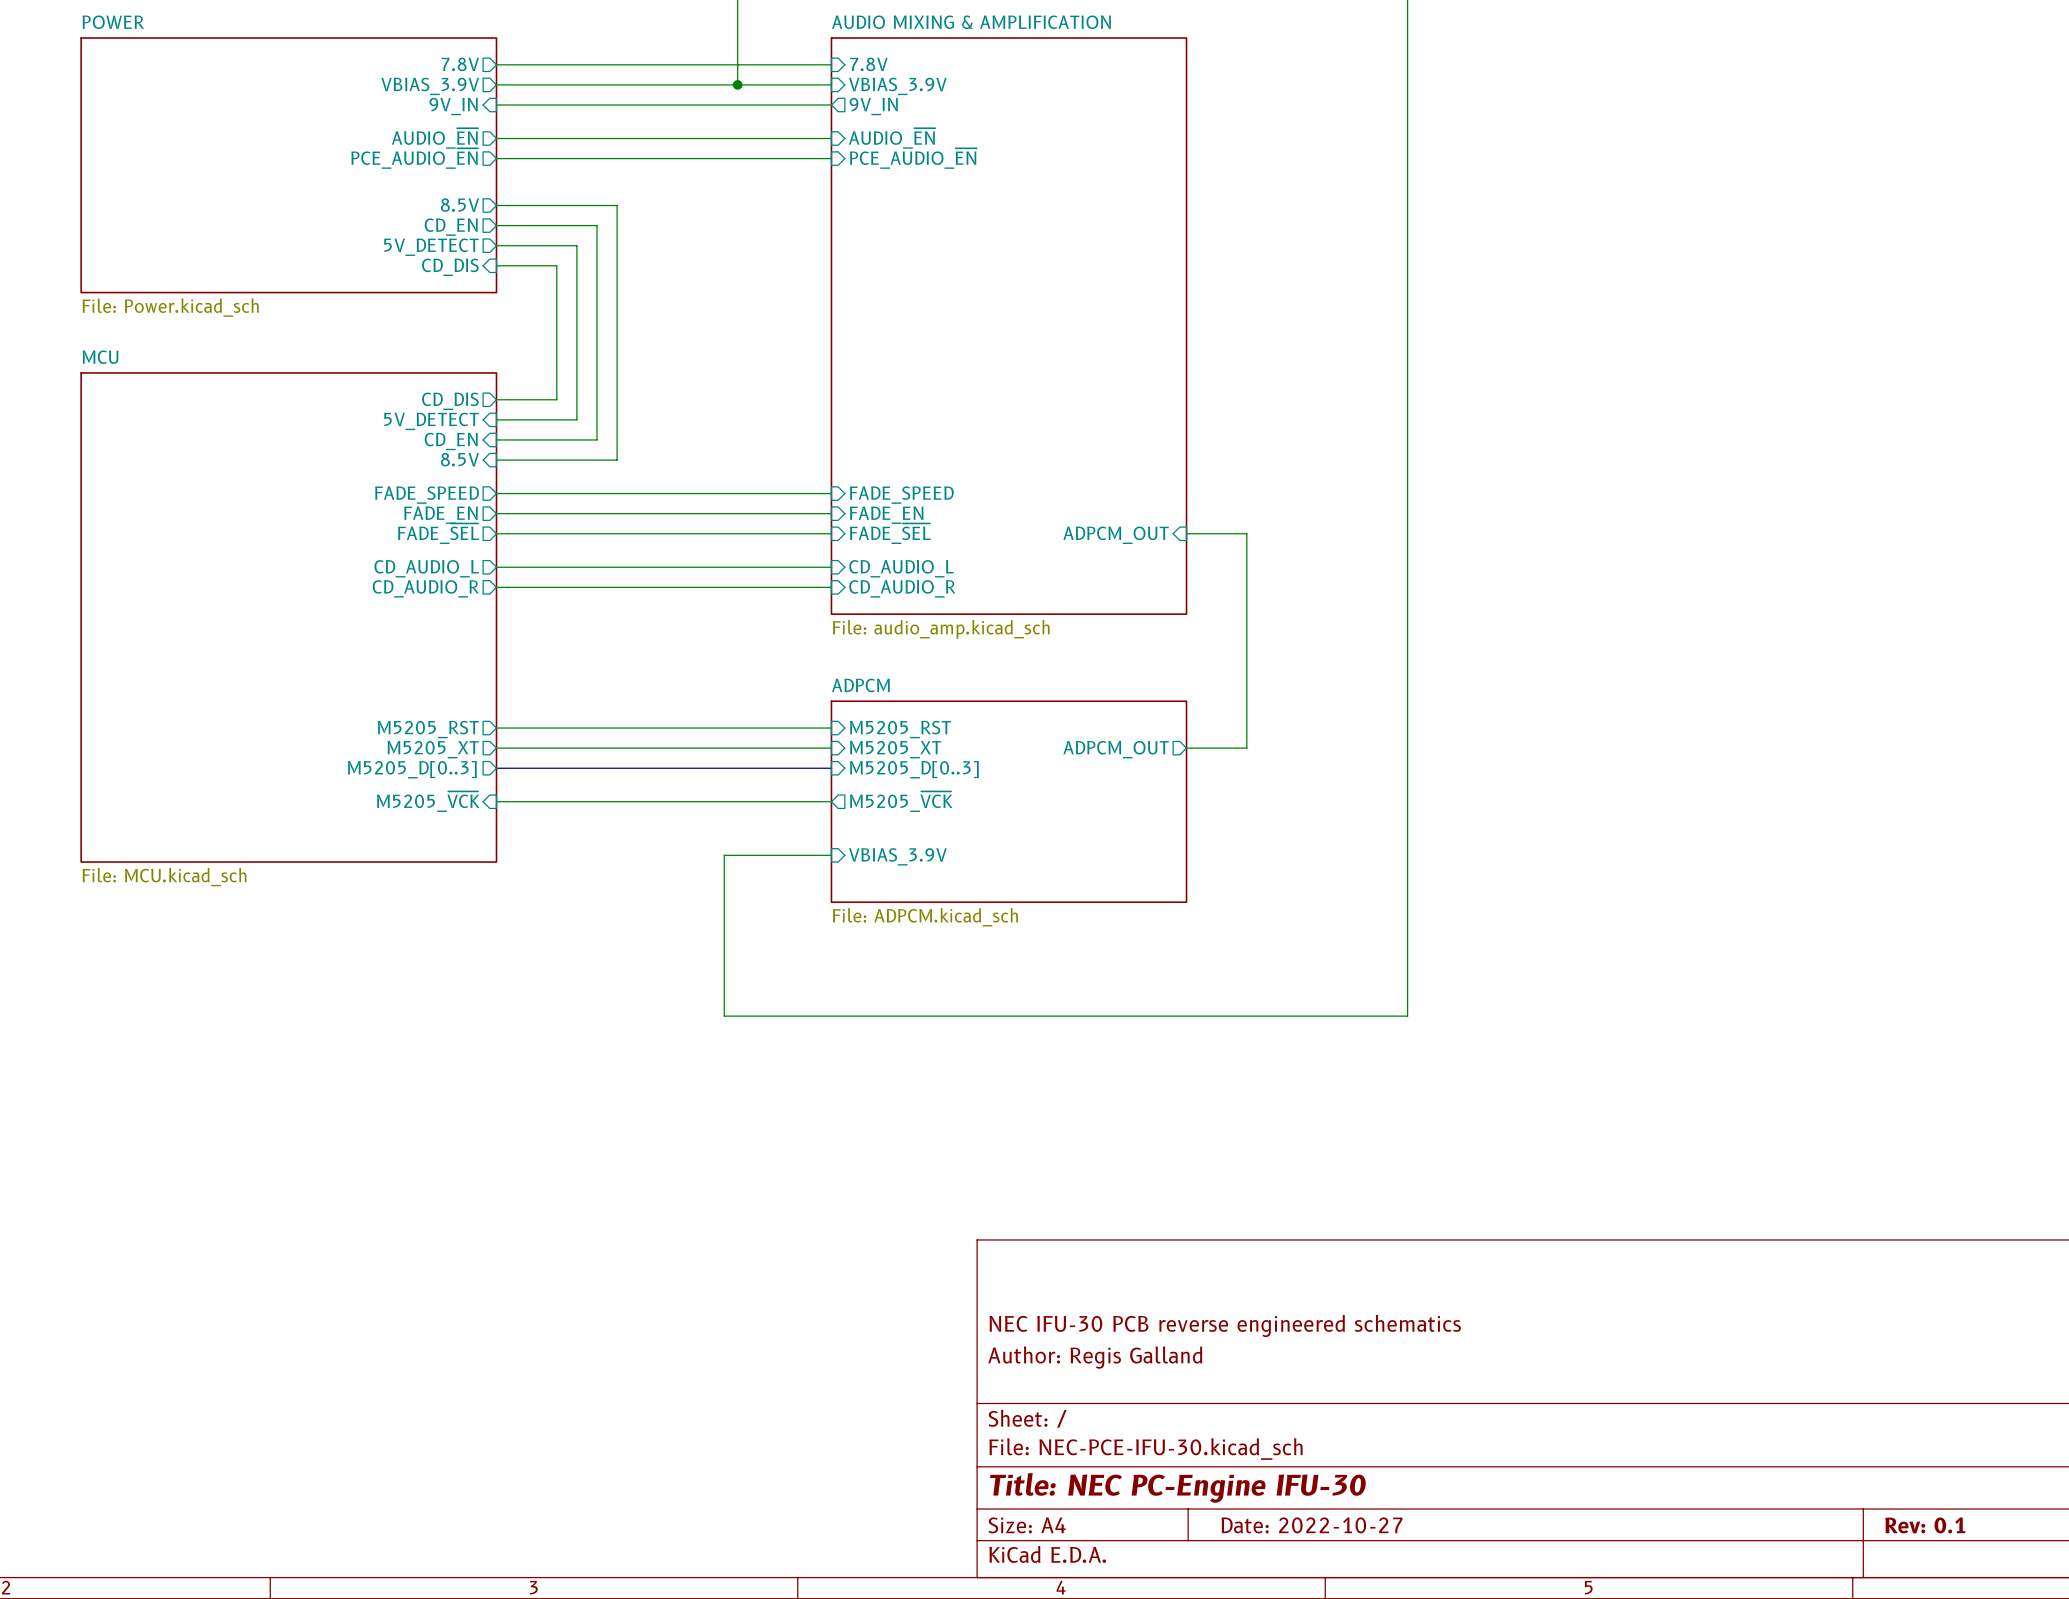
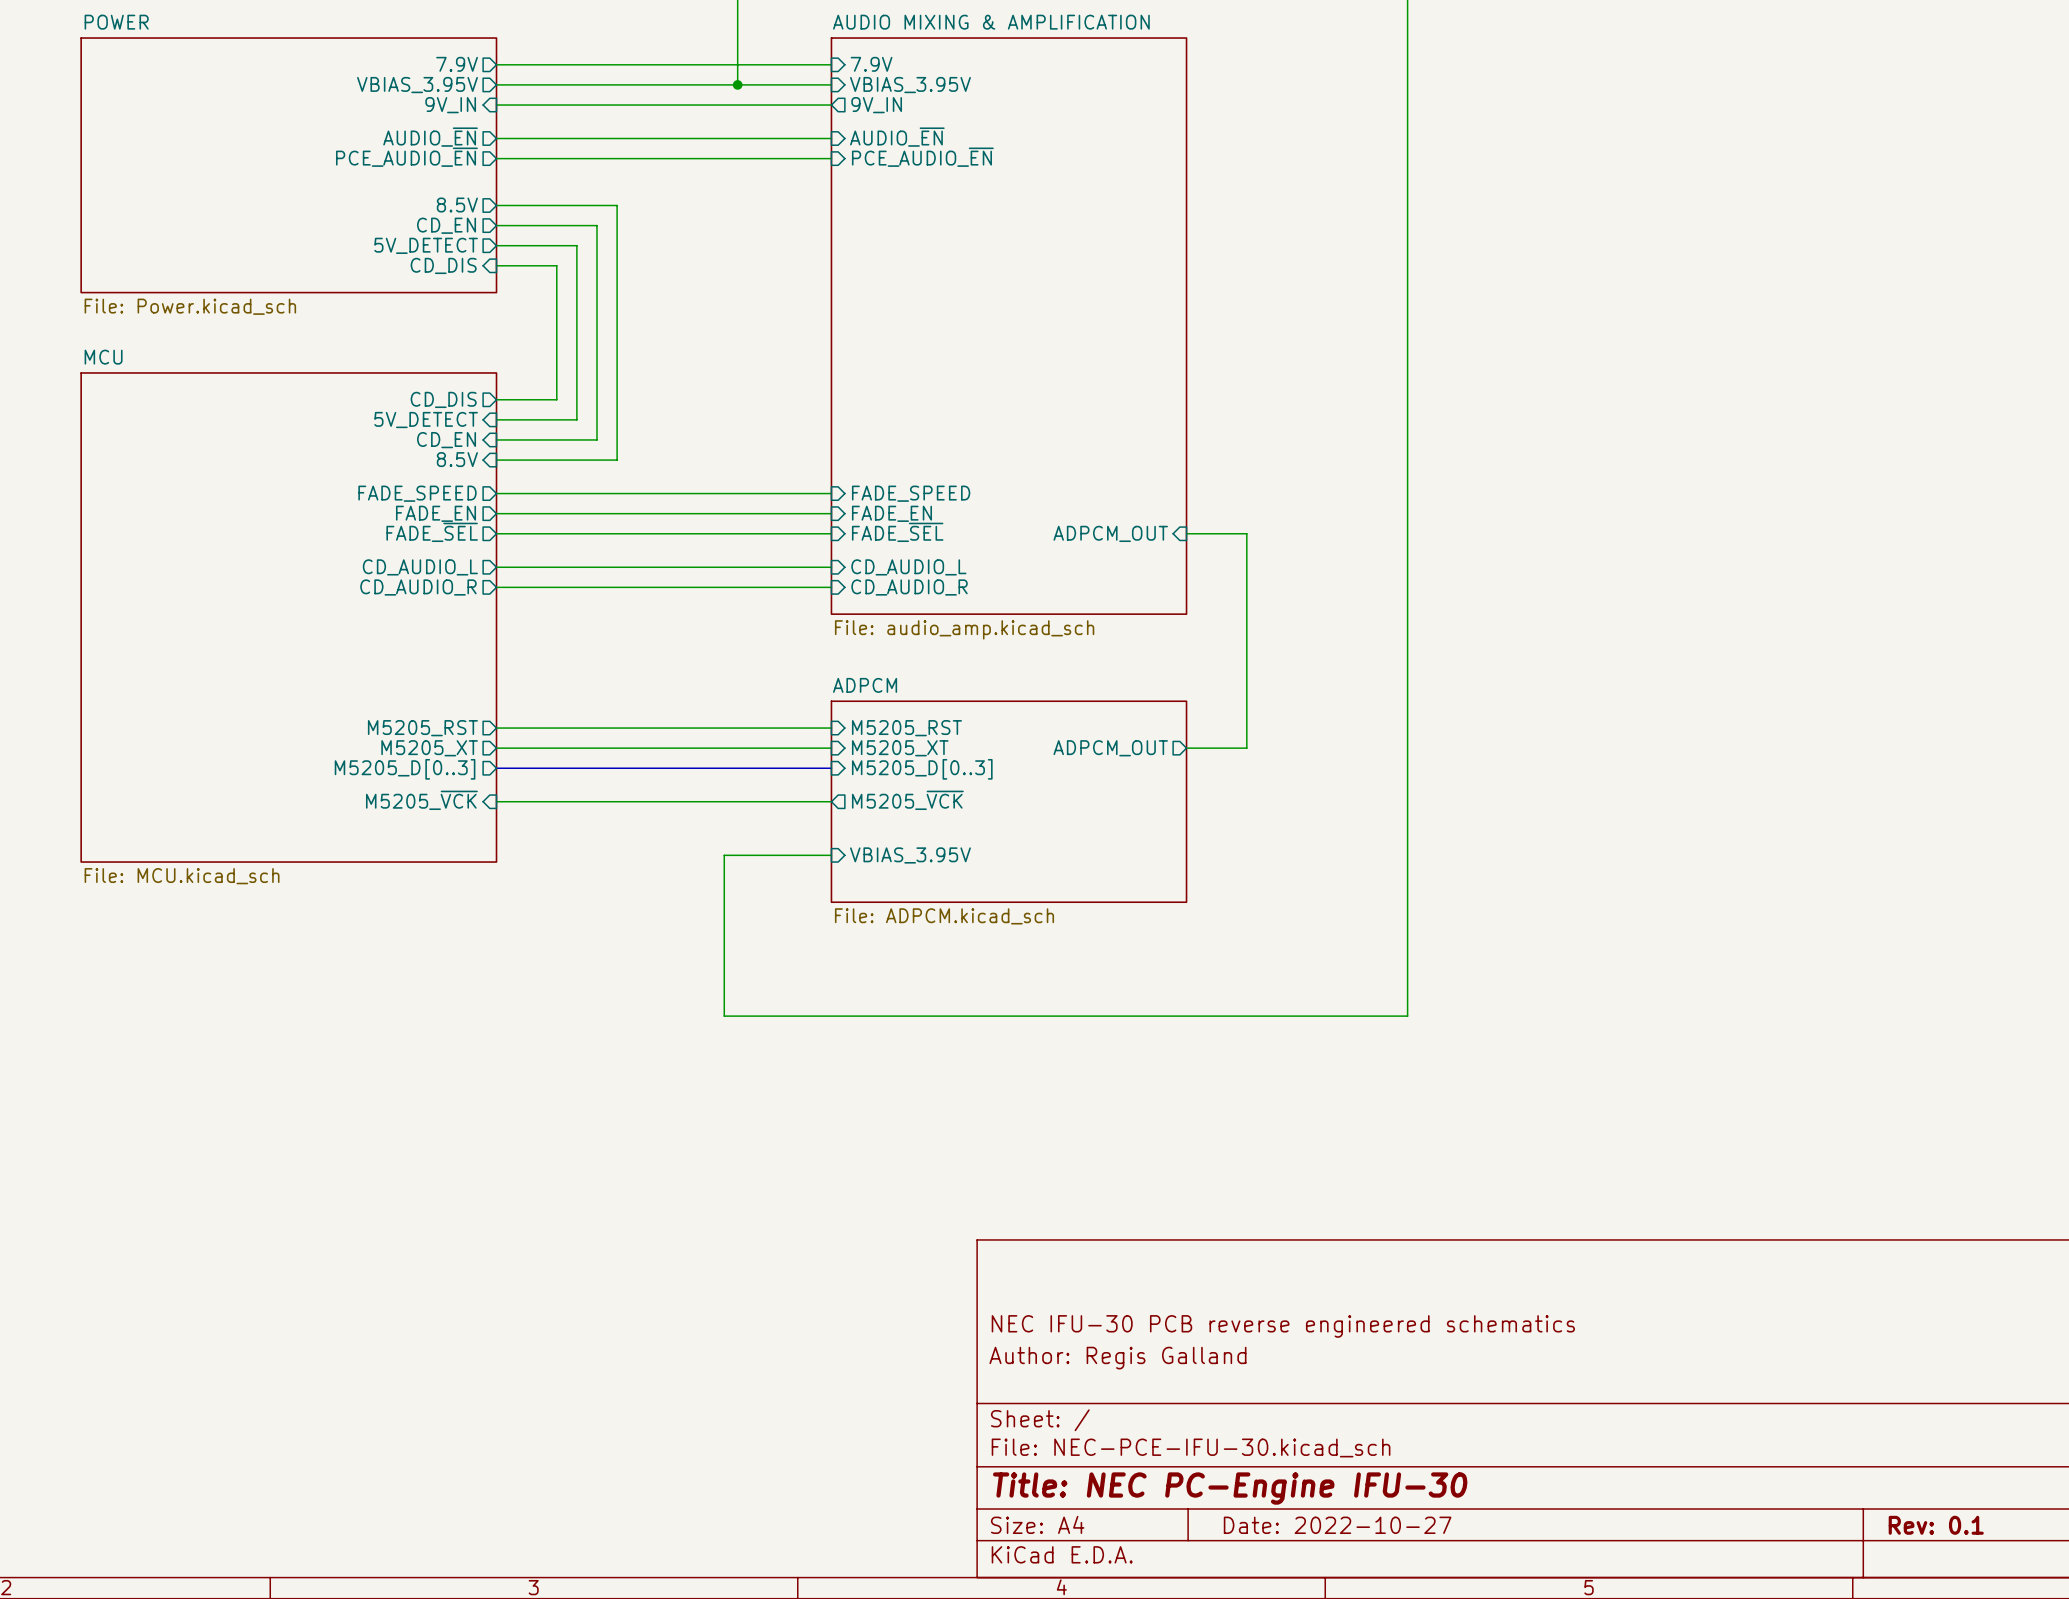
sheet pin: 7.8V (460, 64) -> 7.9V (457, 64)
sheet pin: 7.8V (868, 64) -> 7.9V (871, 64)
sheet pin: VBIAS_3.9V (430, 86) -> VBIAS_3.95V (417, 85)
sheet pin: VBIAS_3.9V (897, 86) -> VBIAS_3.95V (910, 85)
sheet pin: VBIAS_3.9V (897, 856) -> VBIAS_3.95V (910, 855)

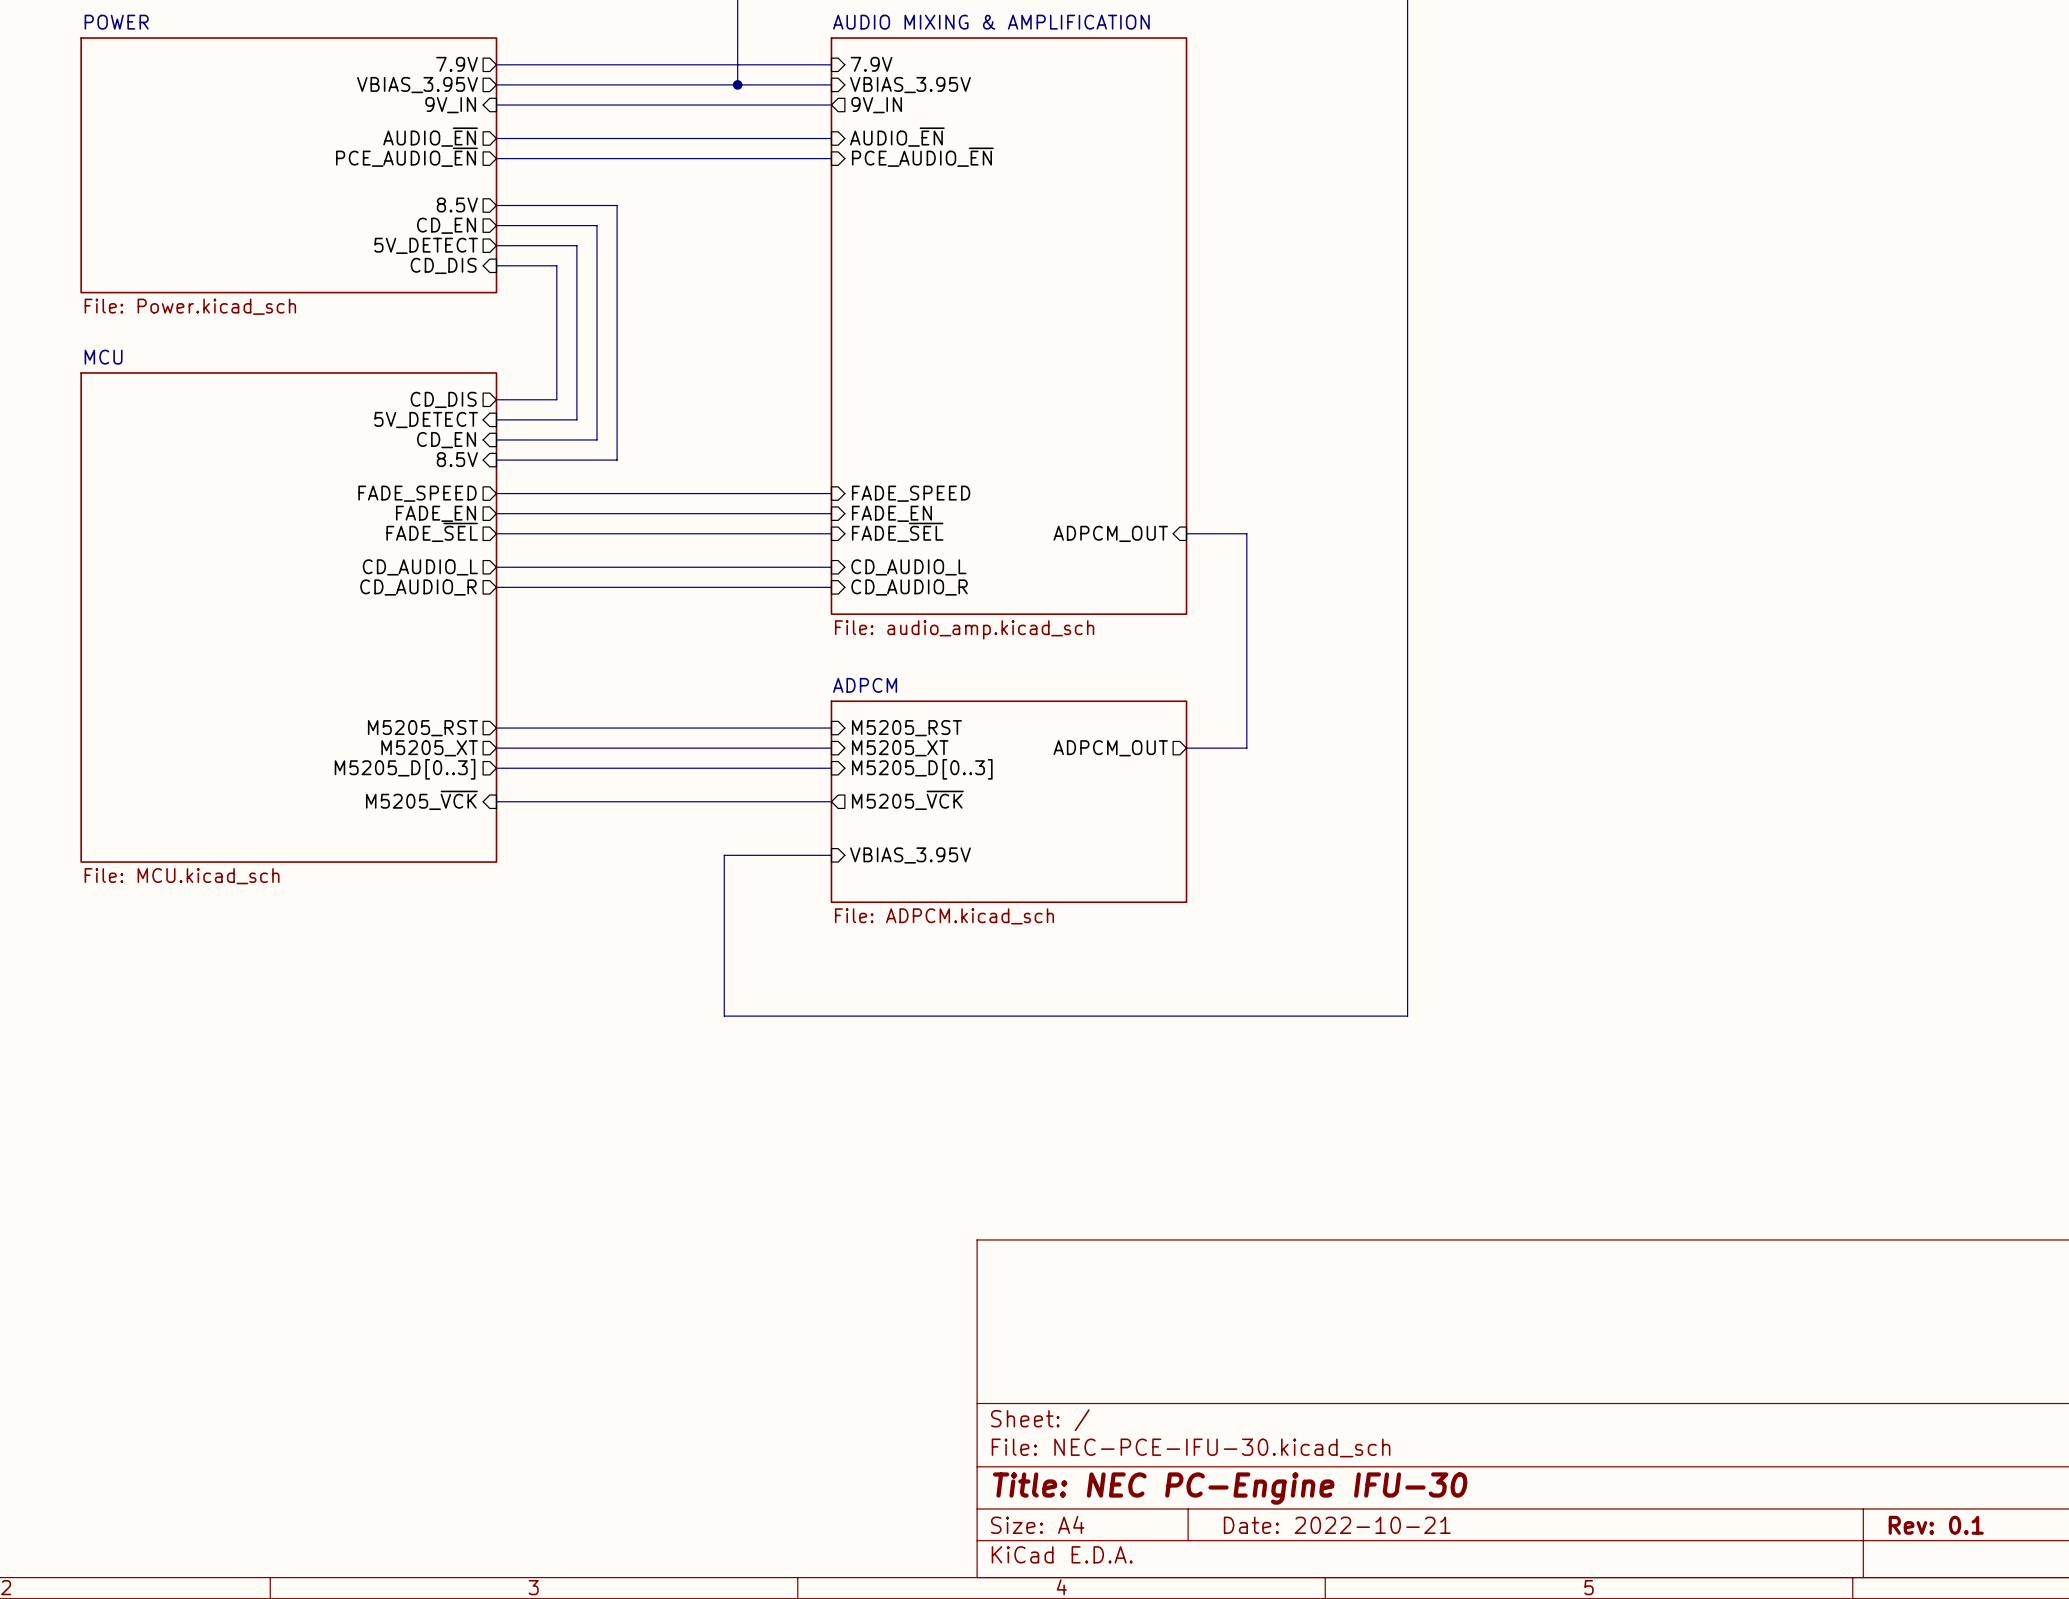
title block: NEC IFU-30 PCB reverse engineered schematics (1283, 1326) -> none
title block: Author: Regis Galland (1117, 1358) -> none
title block: Date: 2022-10-27 (1337, 1525) -> Date: 2022-10-21 (1337, 1525)

